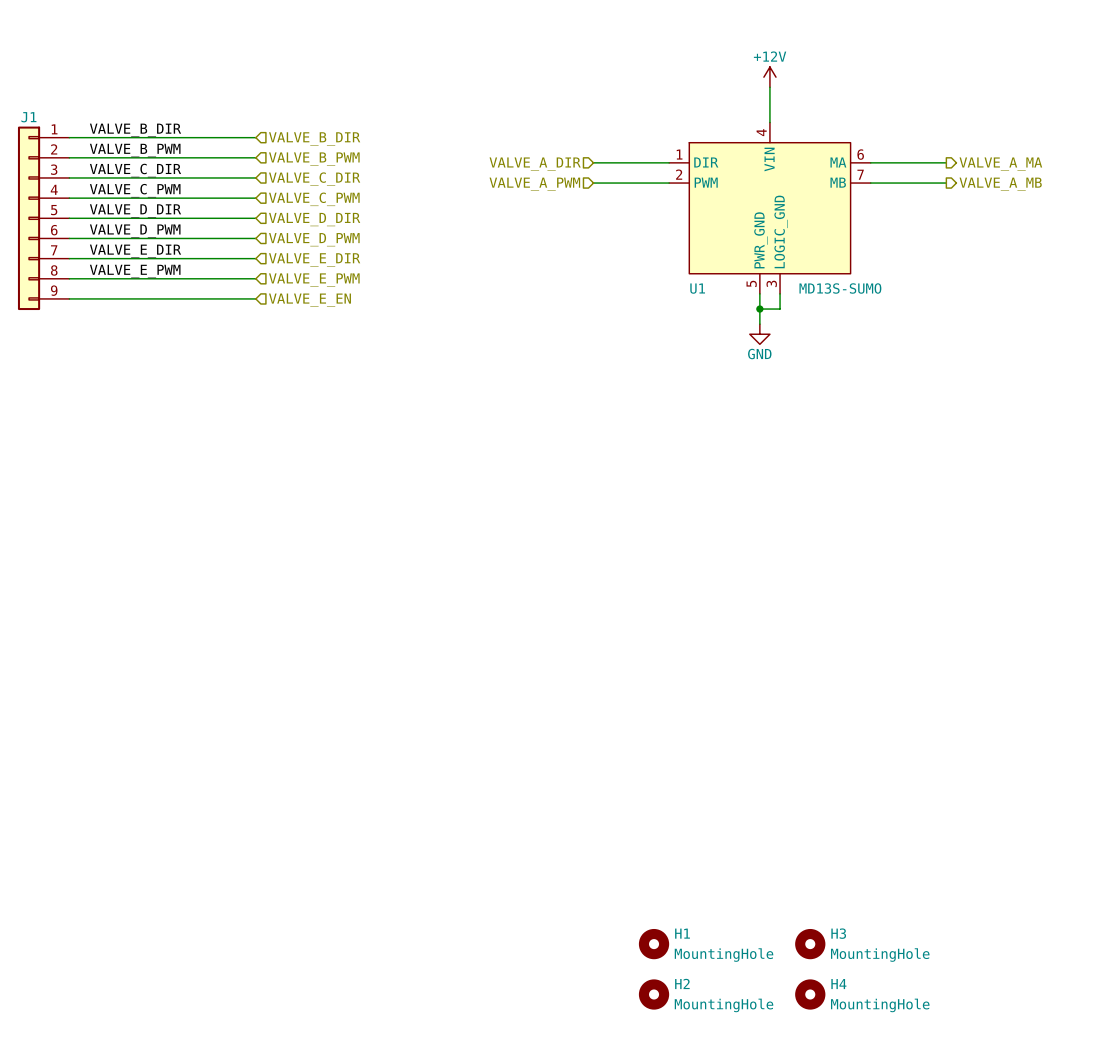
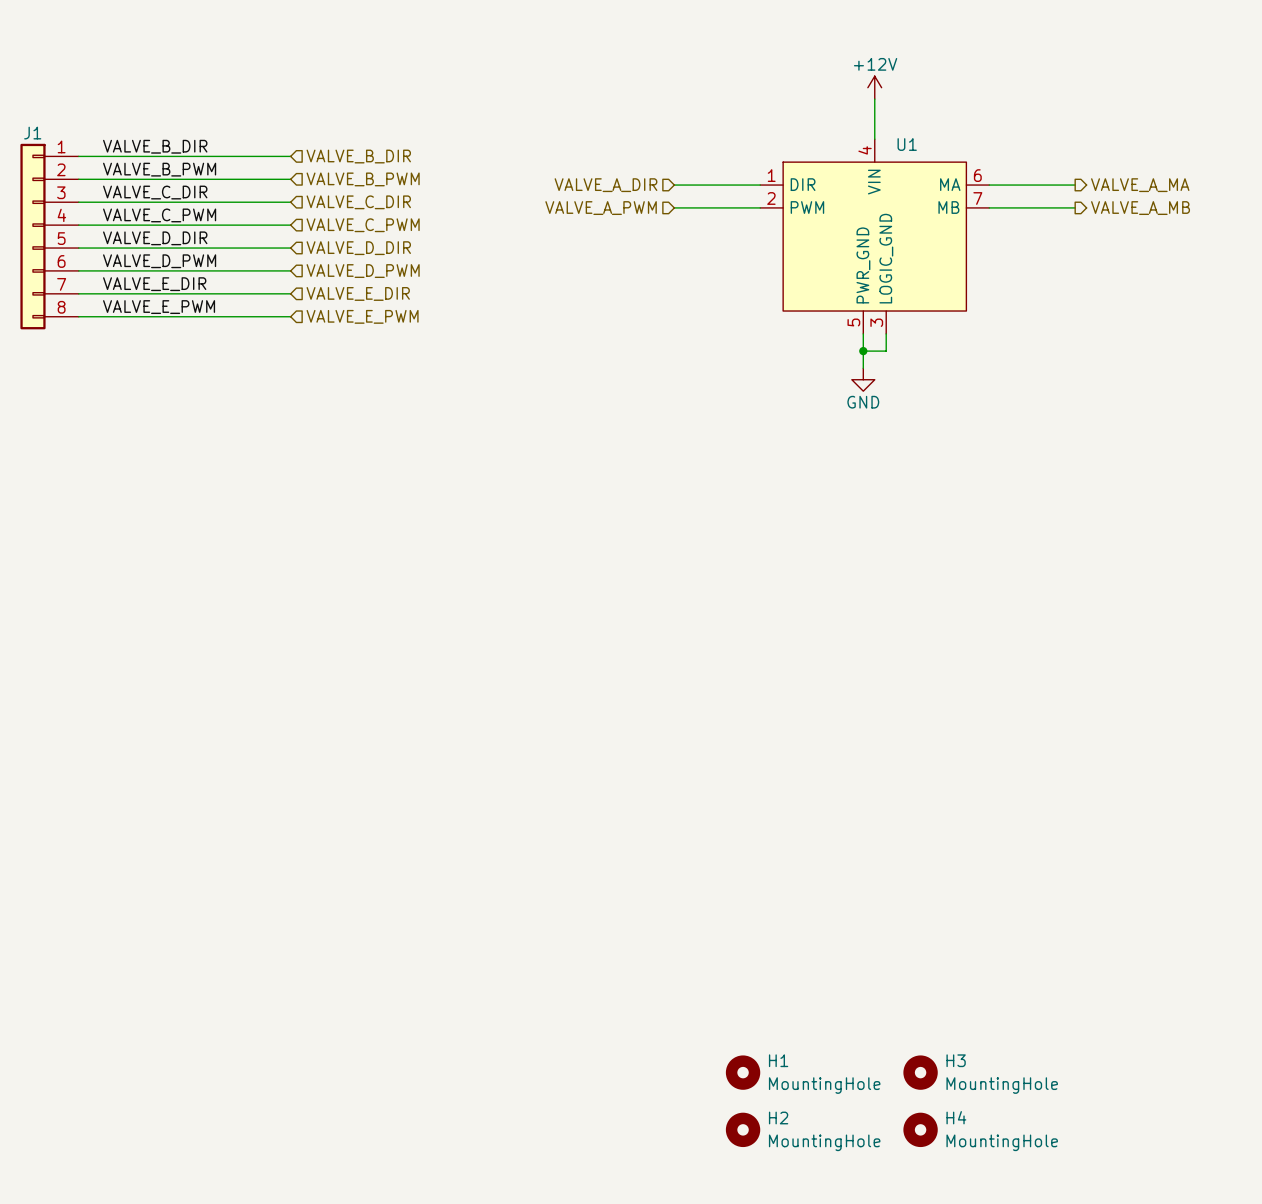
J1 symbol: [17, 126, 70, 311] -> [20, 143, 79, 330]
U1 name position: U1 (697, 288) -> U1 (907, 144)
U1 value: MD13S-SUMO (840, 288) -> none
wire: (69, 298) (255, 298) -> none
hierarchical label: VALVE_E_EN (309, 300) -> none

